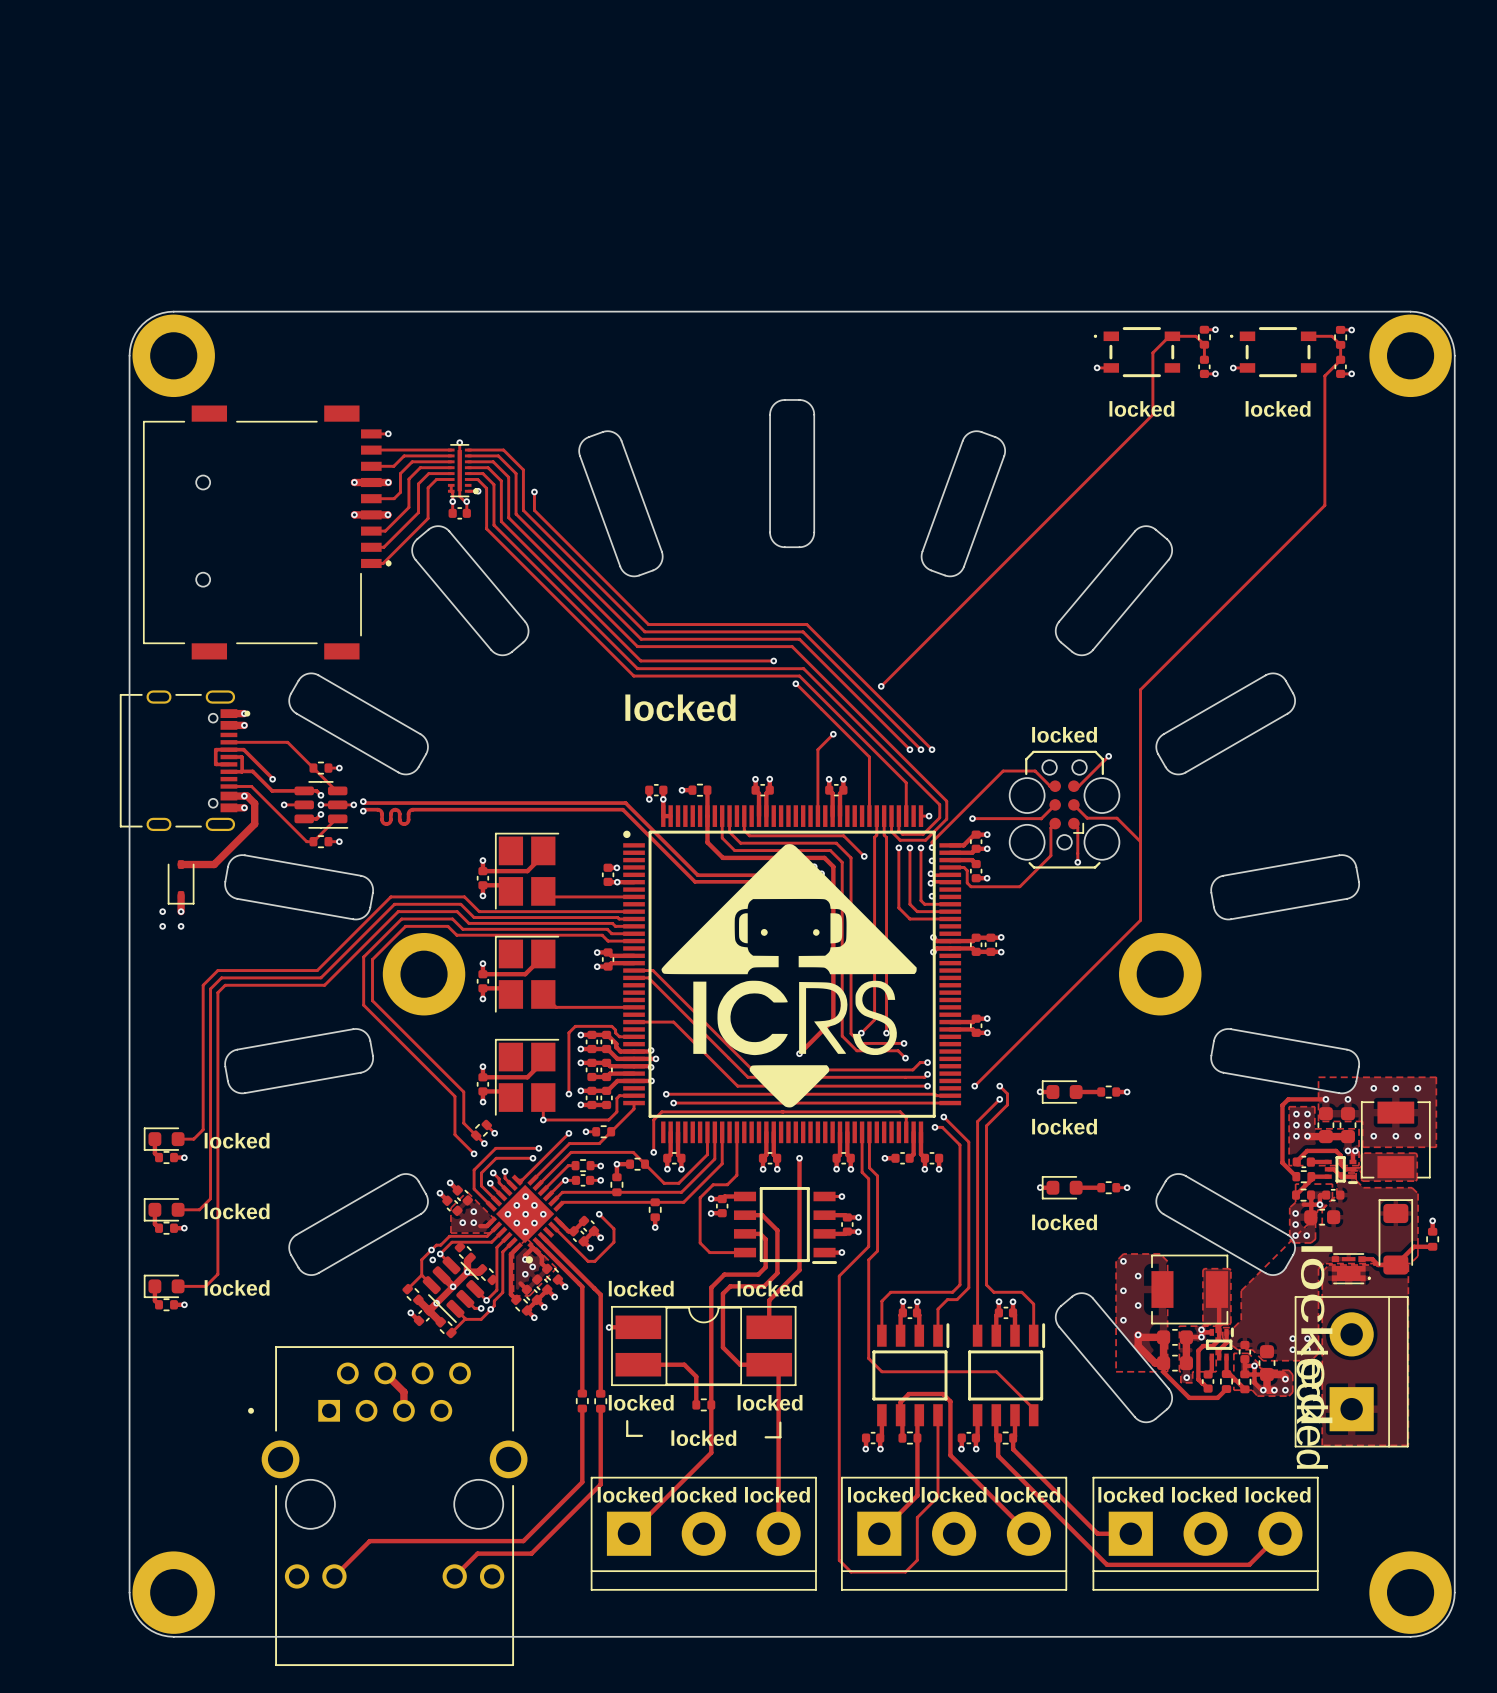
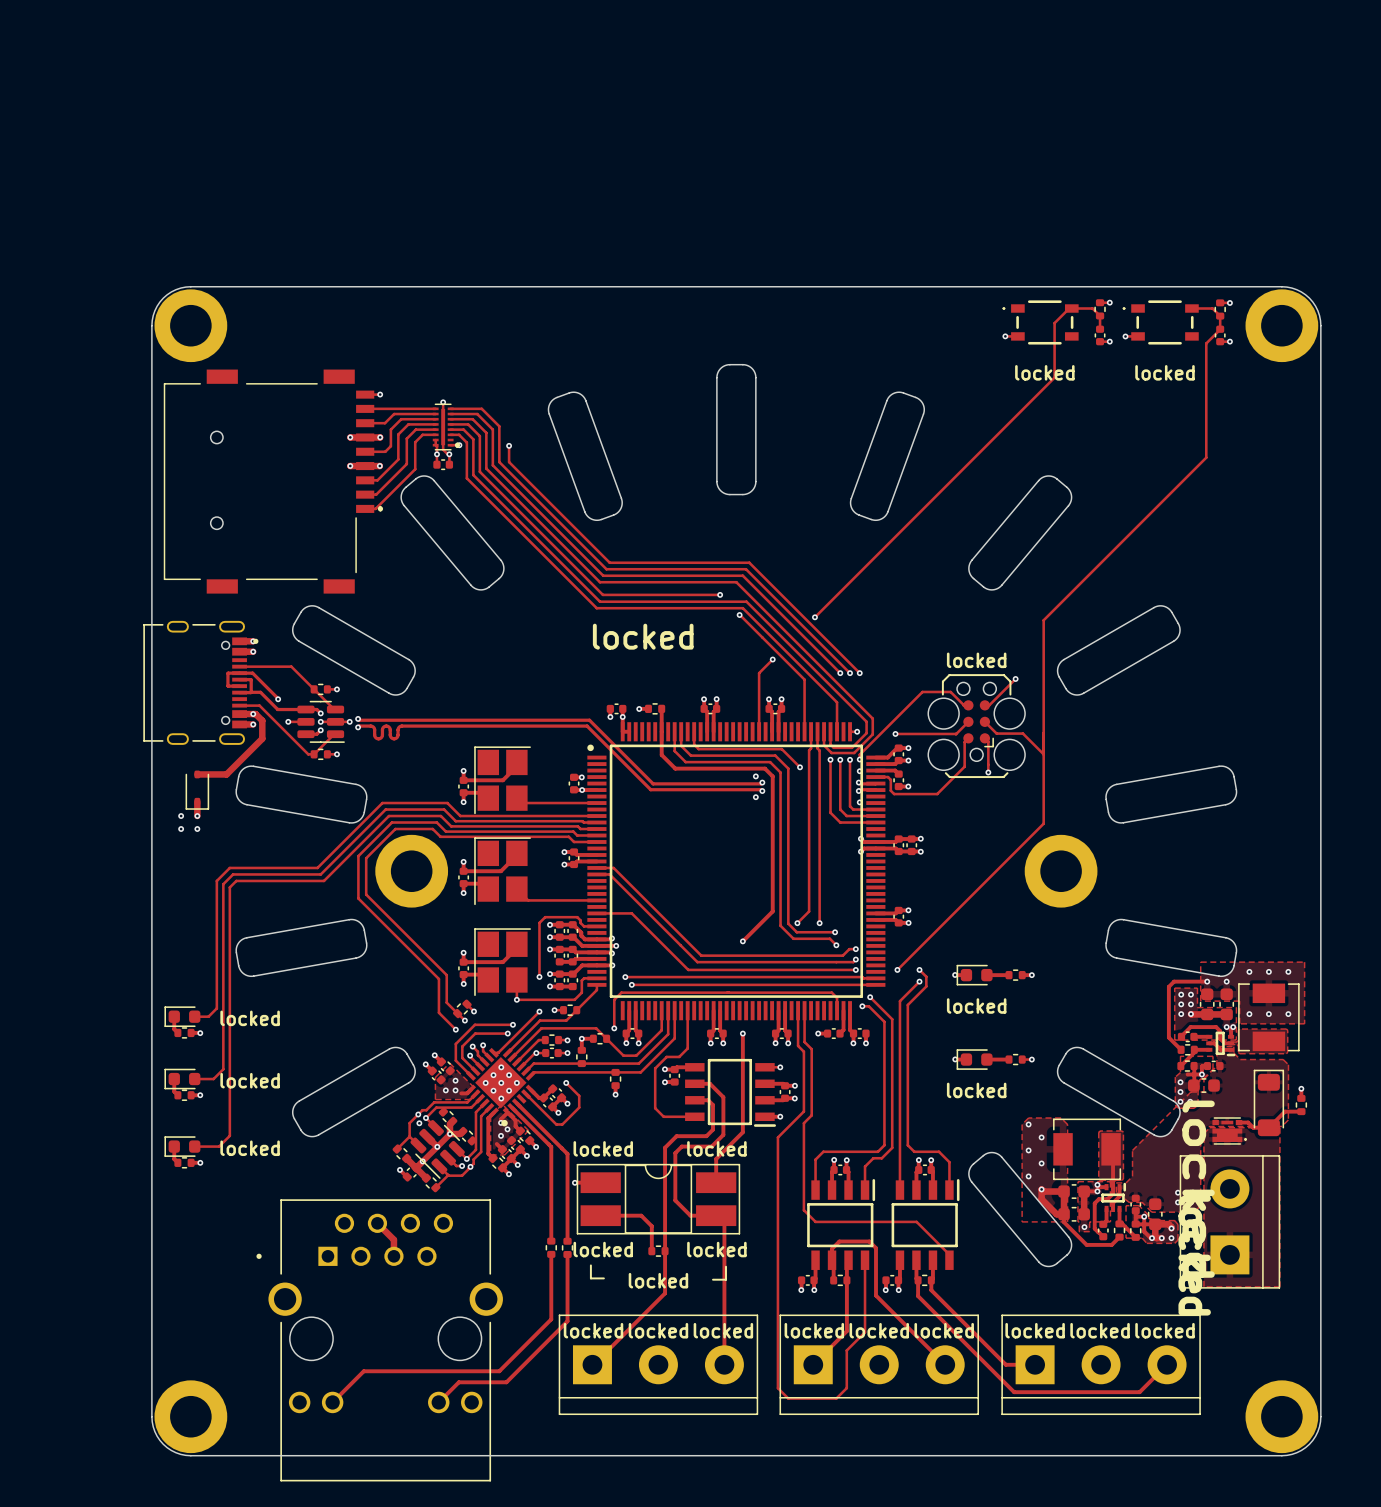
drawing: [661, 844, 917, 1108] -> none

